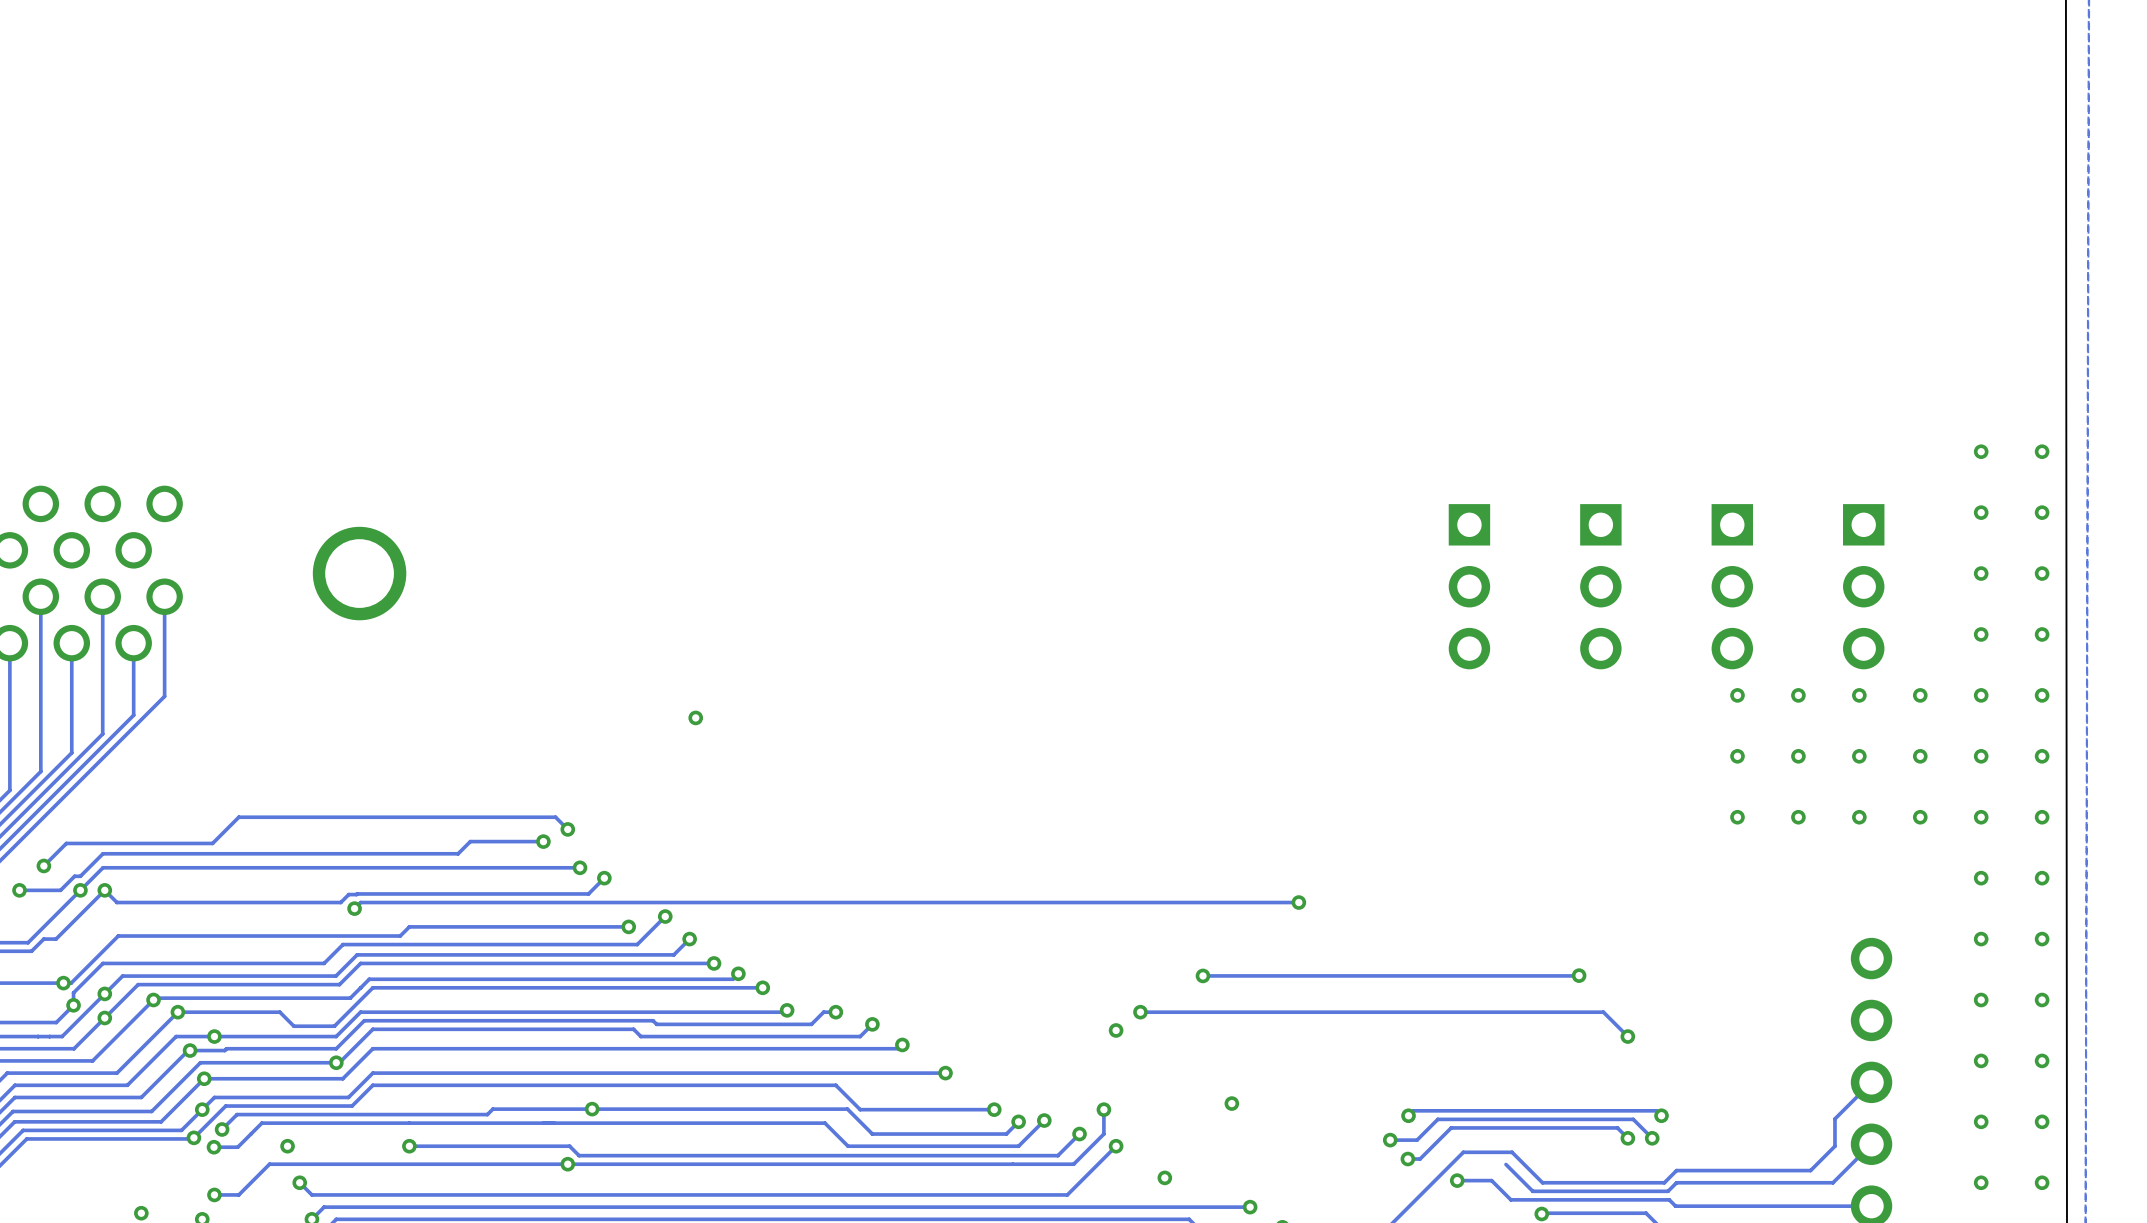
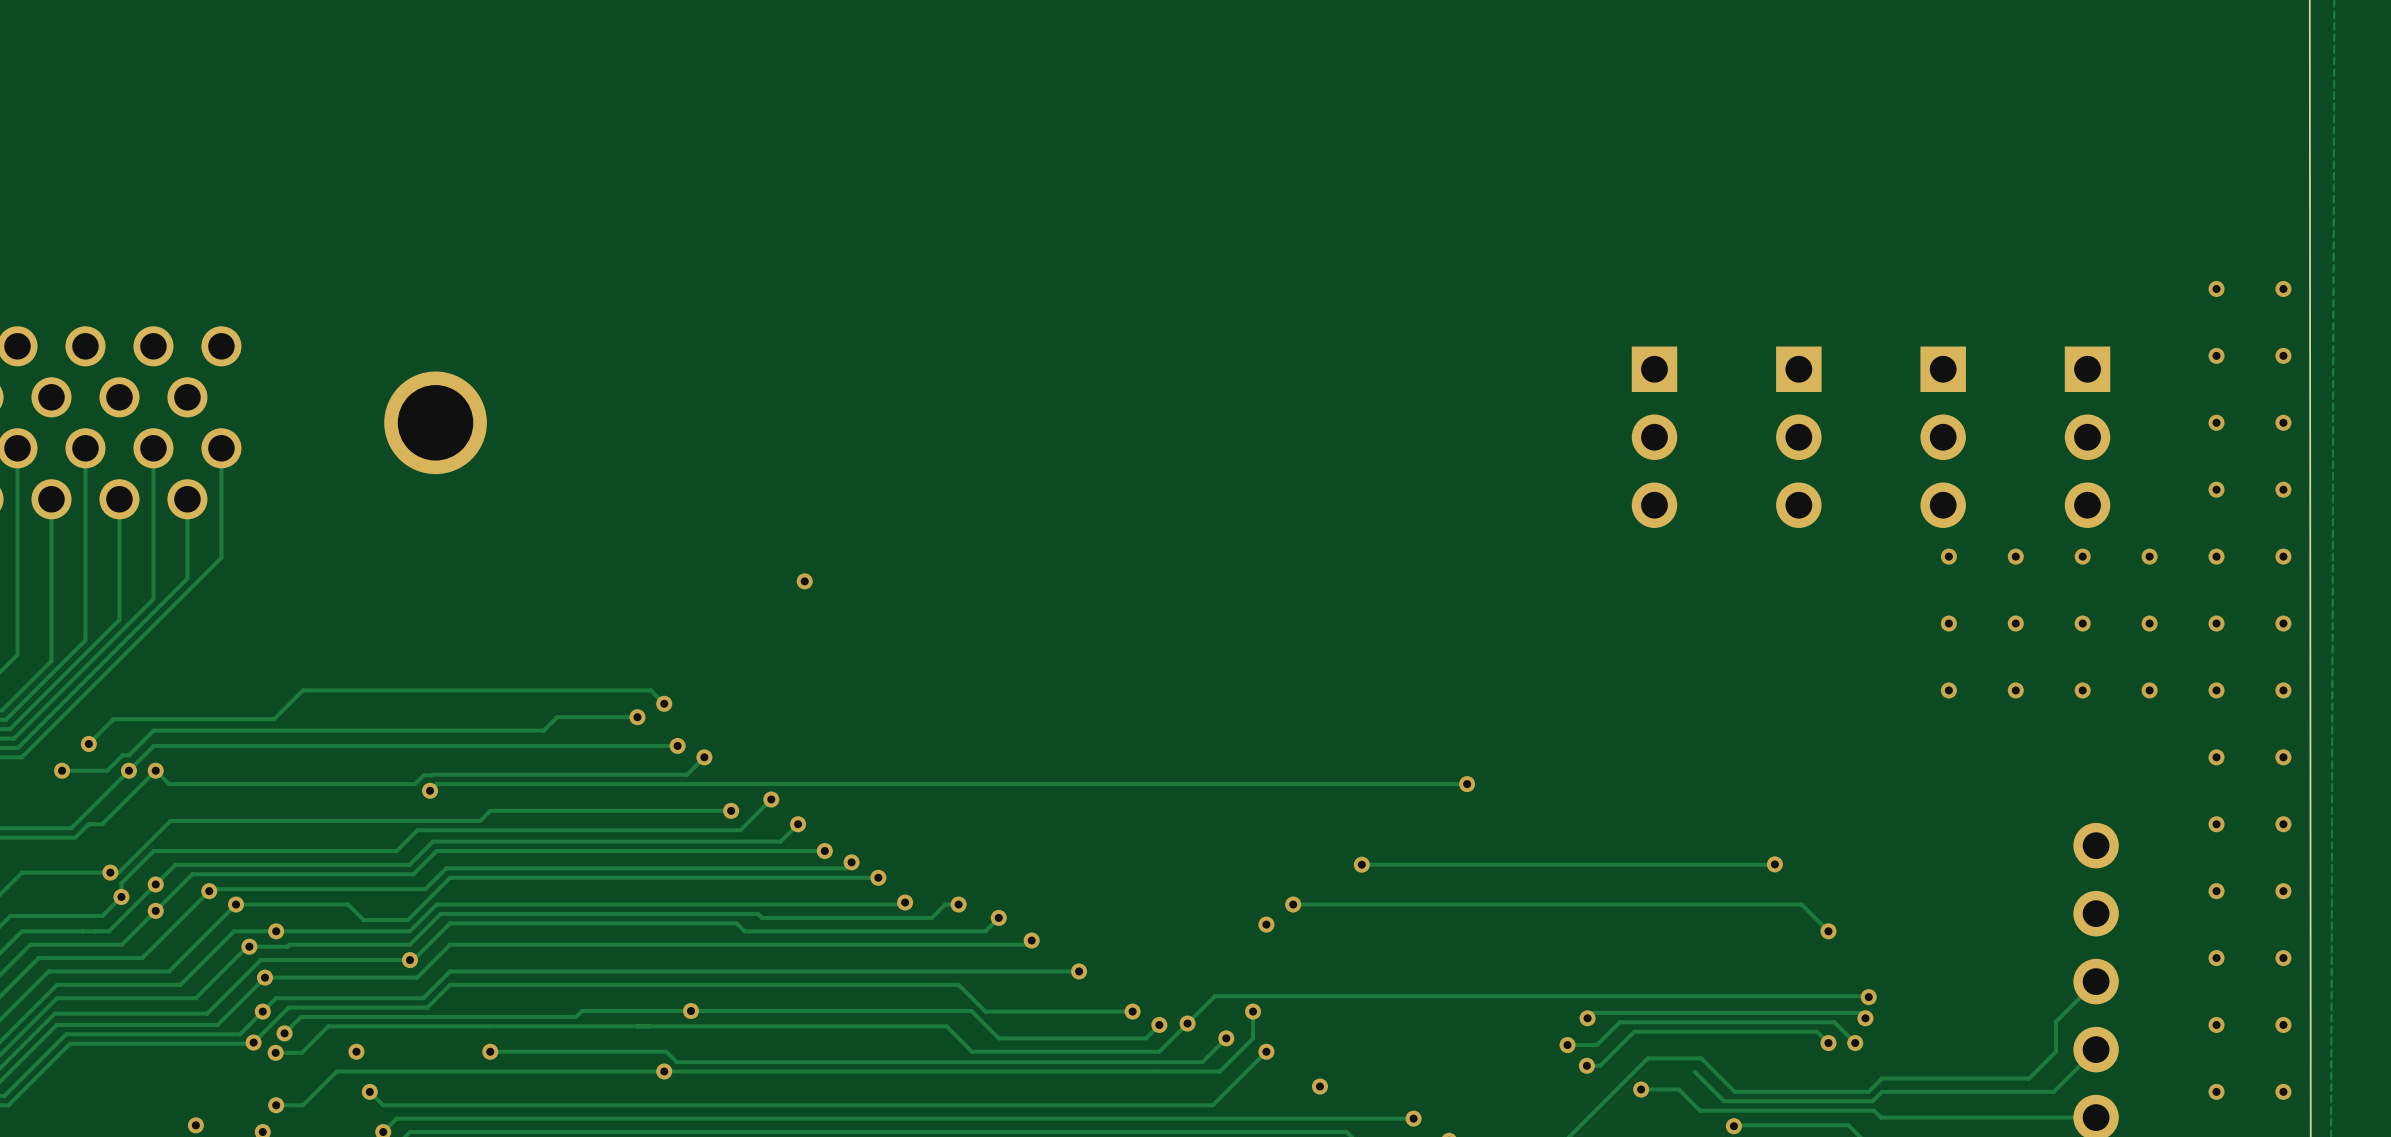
track: none -> (1868, 997) (1214, 996) (1187, 1023)
via: none -> (1868, 997)
via: (1231, 1103) -> none

